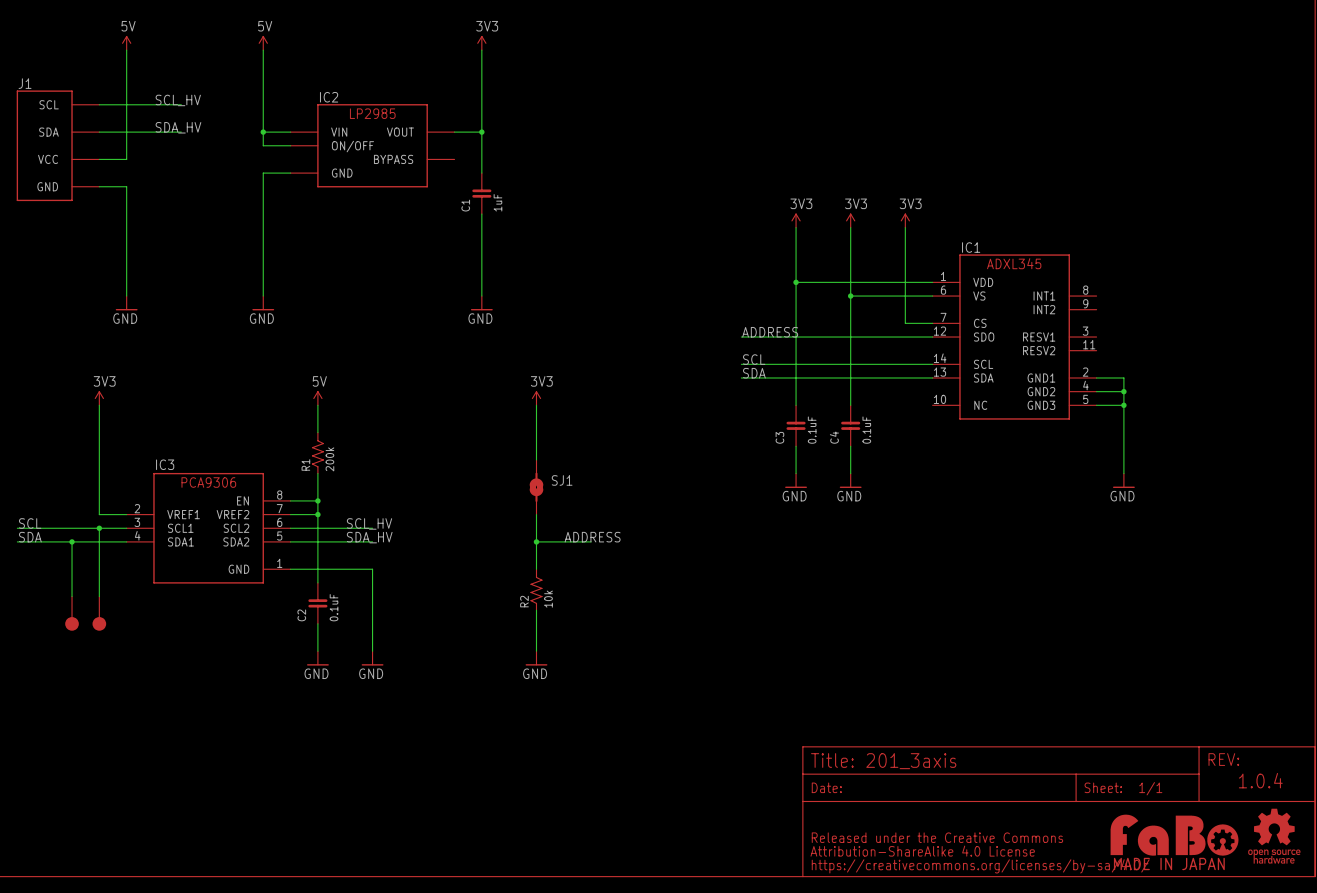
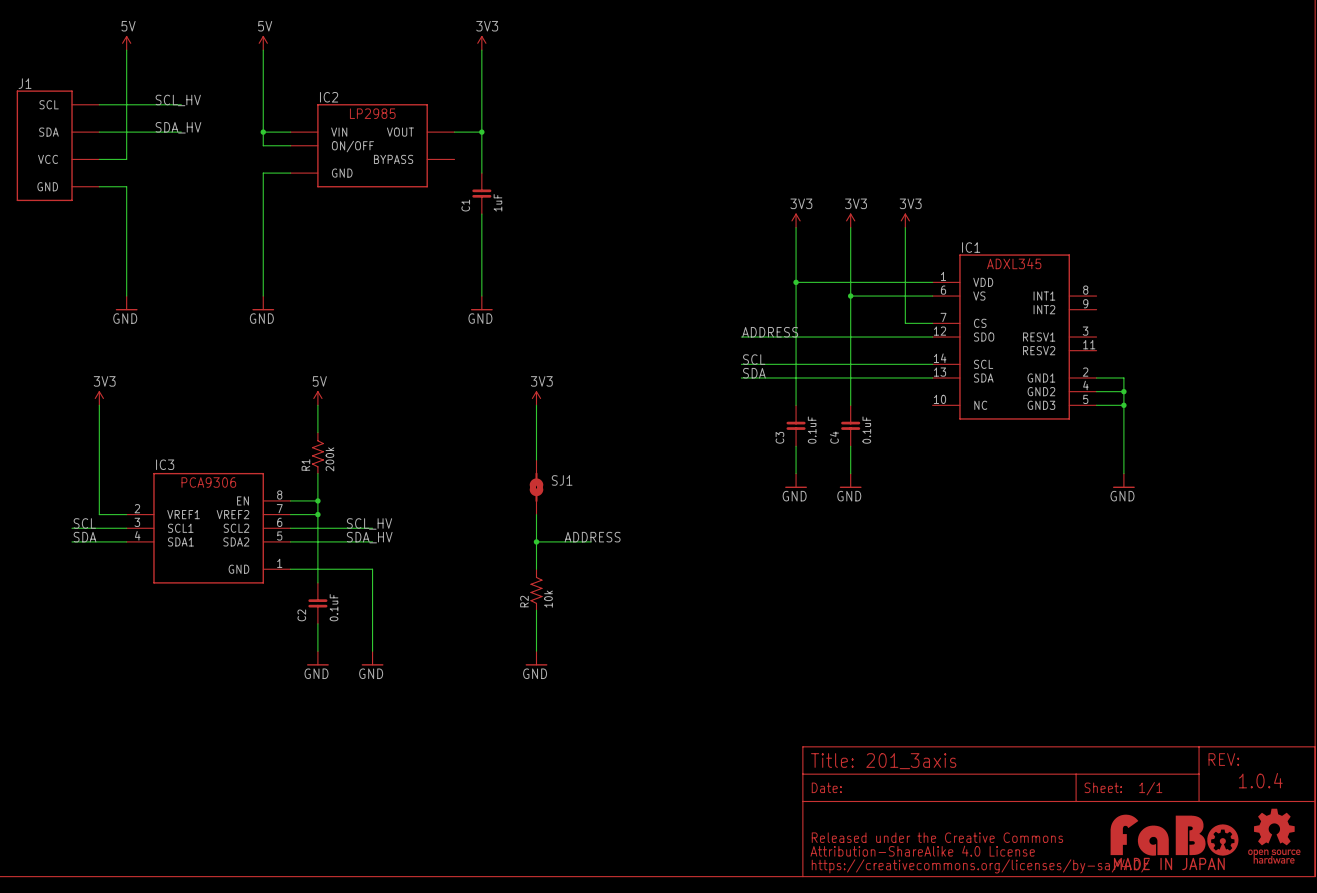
label position: SCL (30, 523) -> SCL (84, 523)
wire: (17, 528) (72, 528) -> none
wire: (99, 528) (99, 596) -> none
junction: (99, 528) -> none
label position: SDA (30, 537) -> SDA (85, 537)
wire: (17, 541) (72, 541) (72, 596) -> none
junction: (72, 541) -> none
part: (72, 613) -> none
part: (99, 613) -> none

